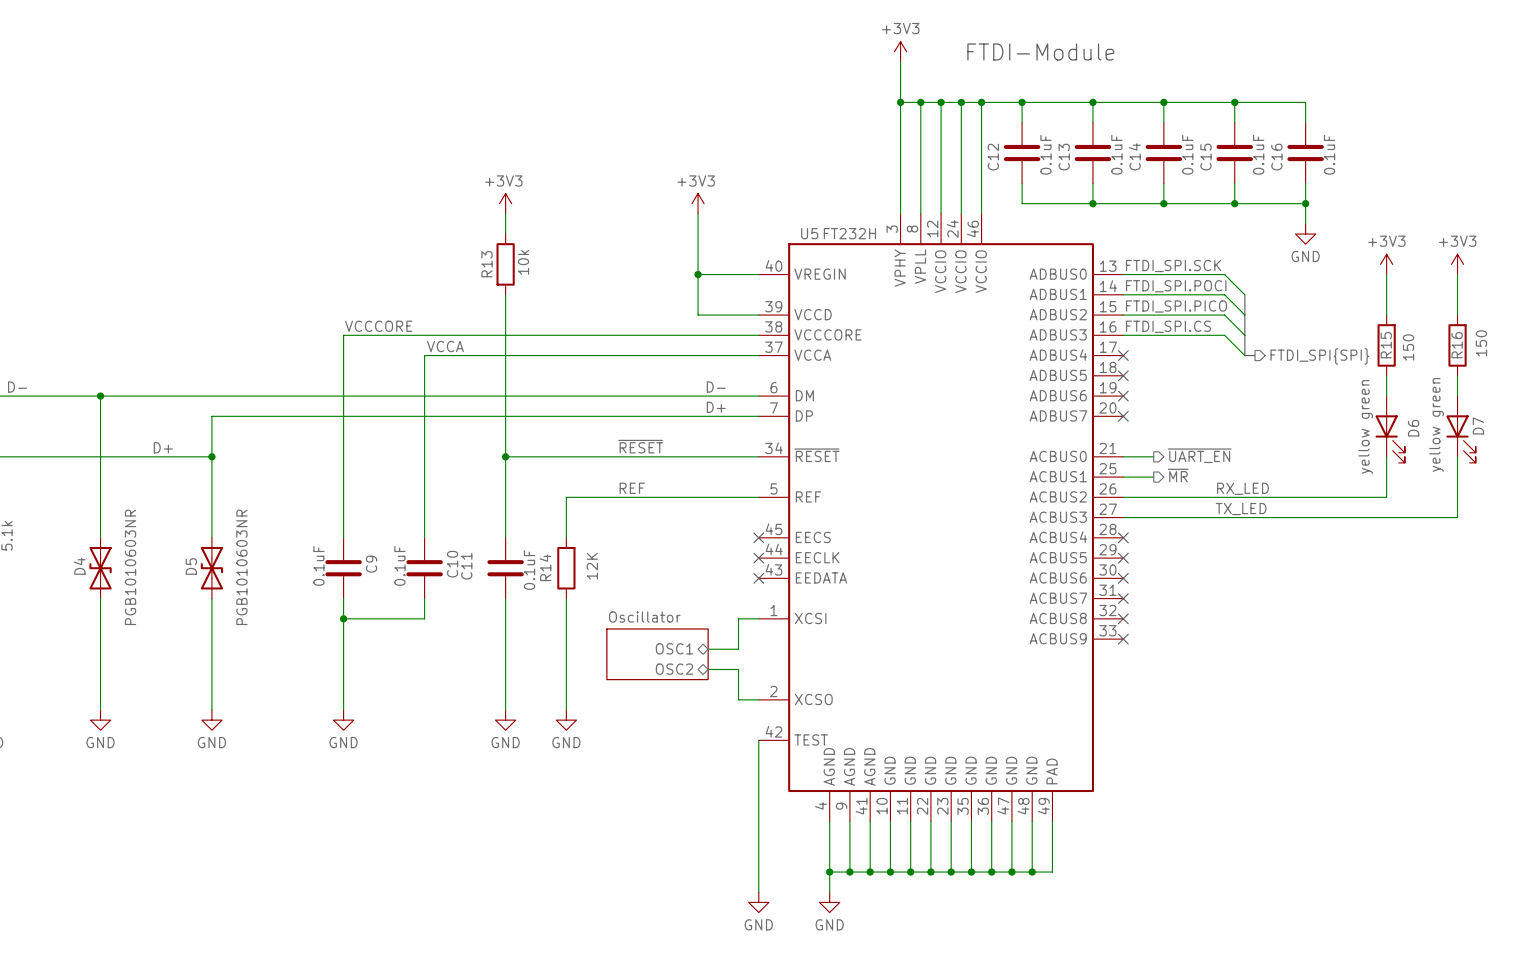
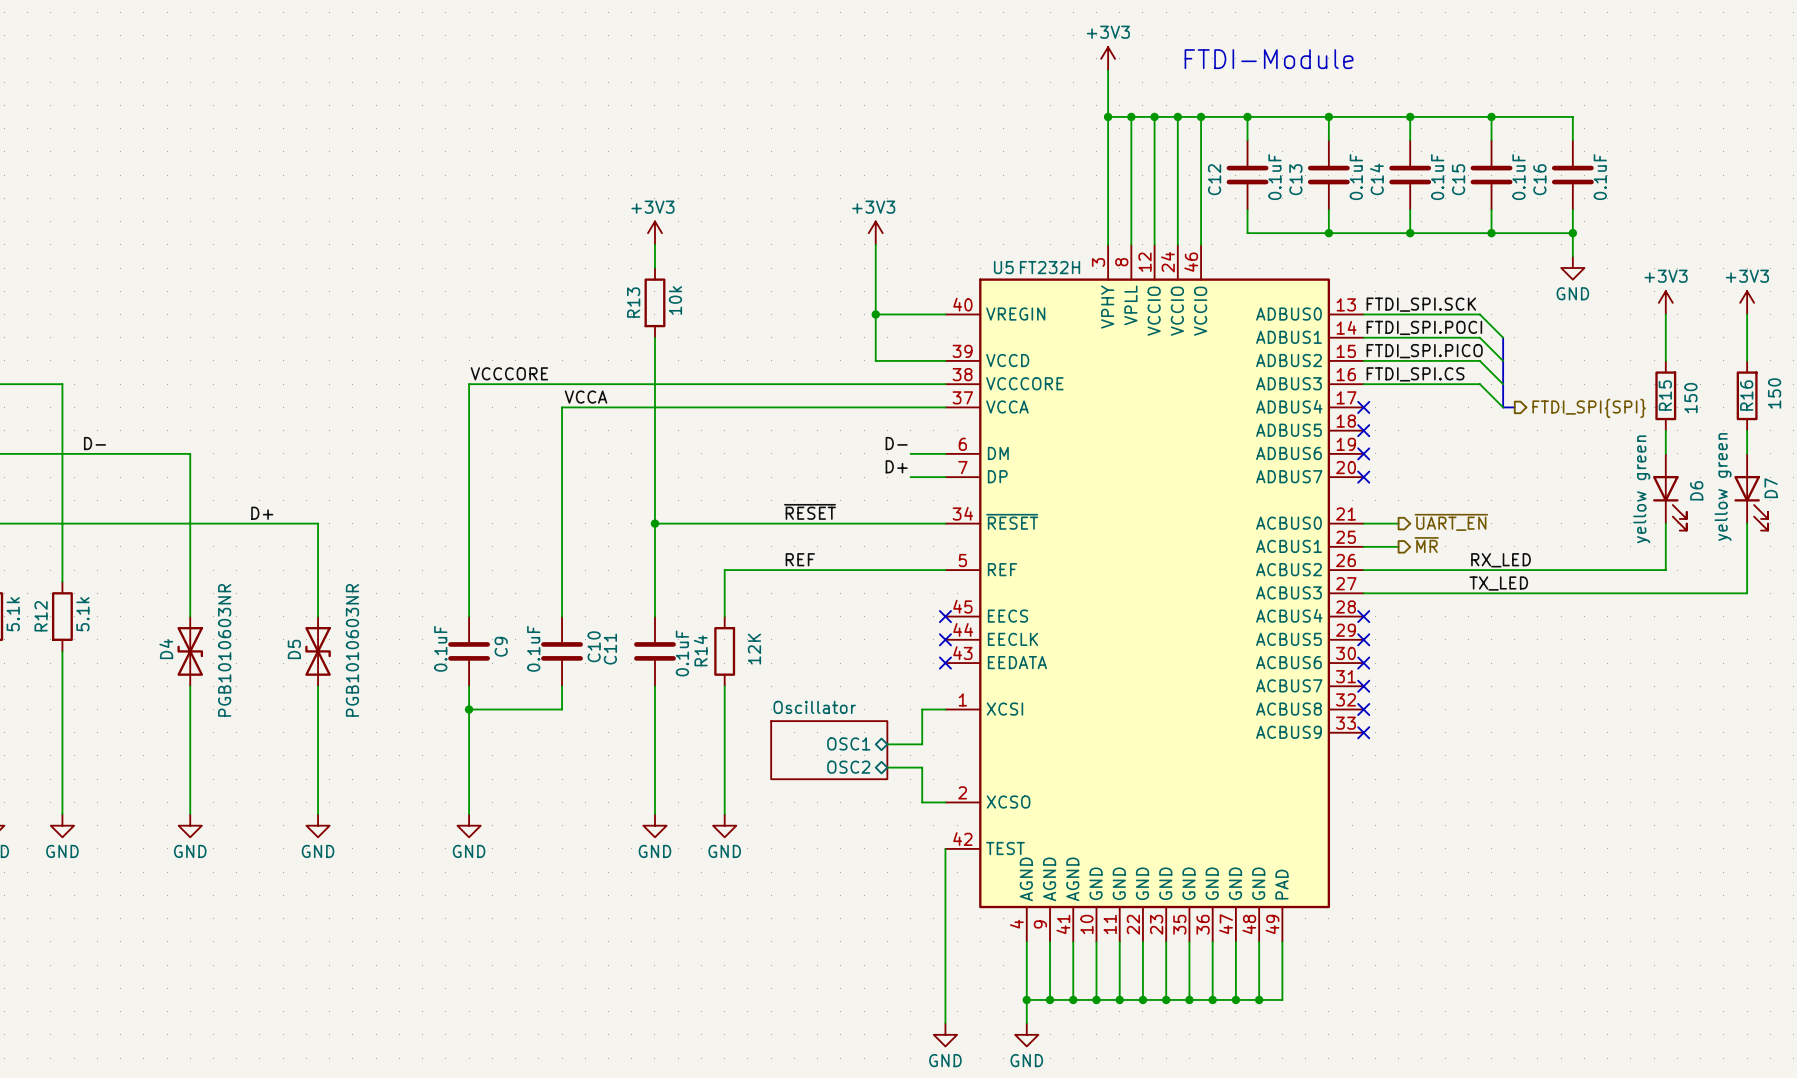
wire: (100, 396) (728, 396) -> none
junction: (100, 396) -> none
wire: (728, 416) (211, 416) (211, 456) -> none
junction: (211, 456) -> none

